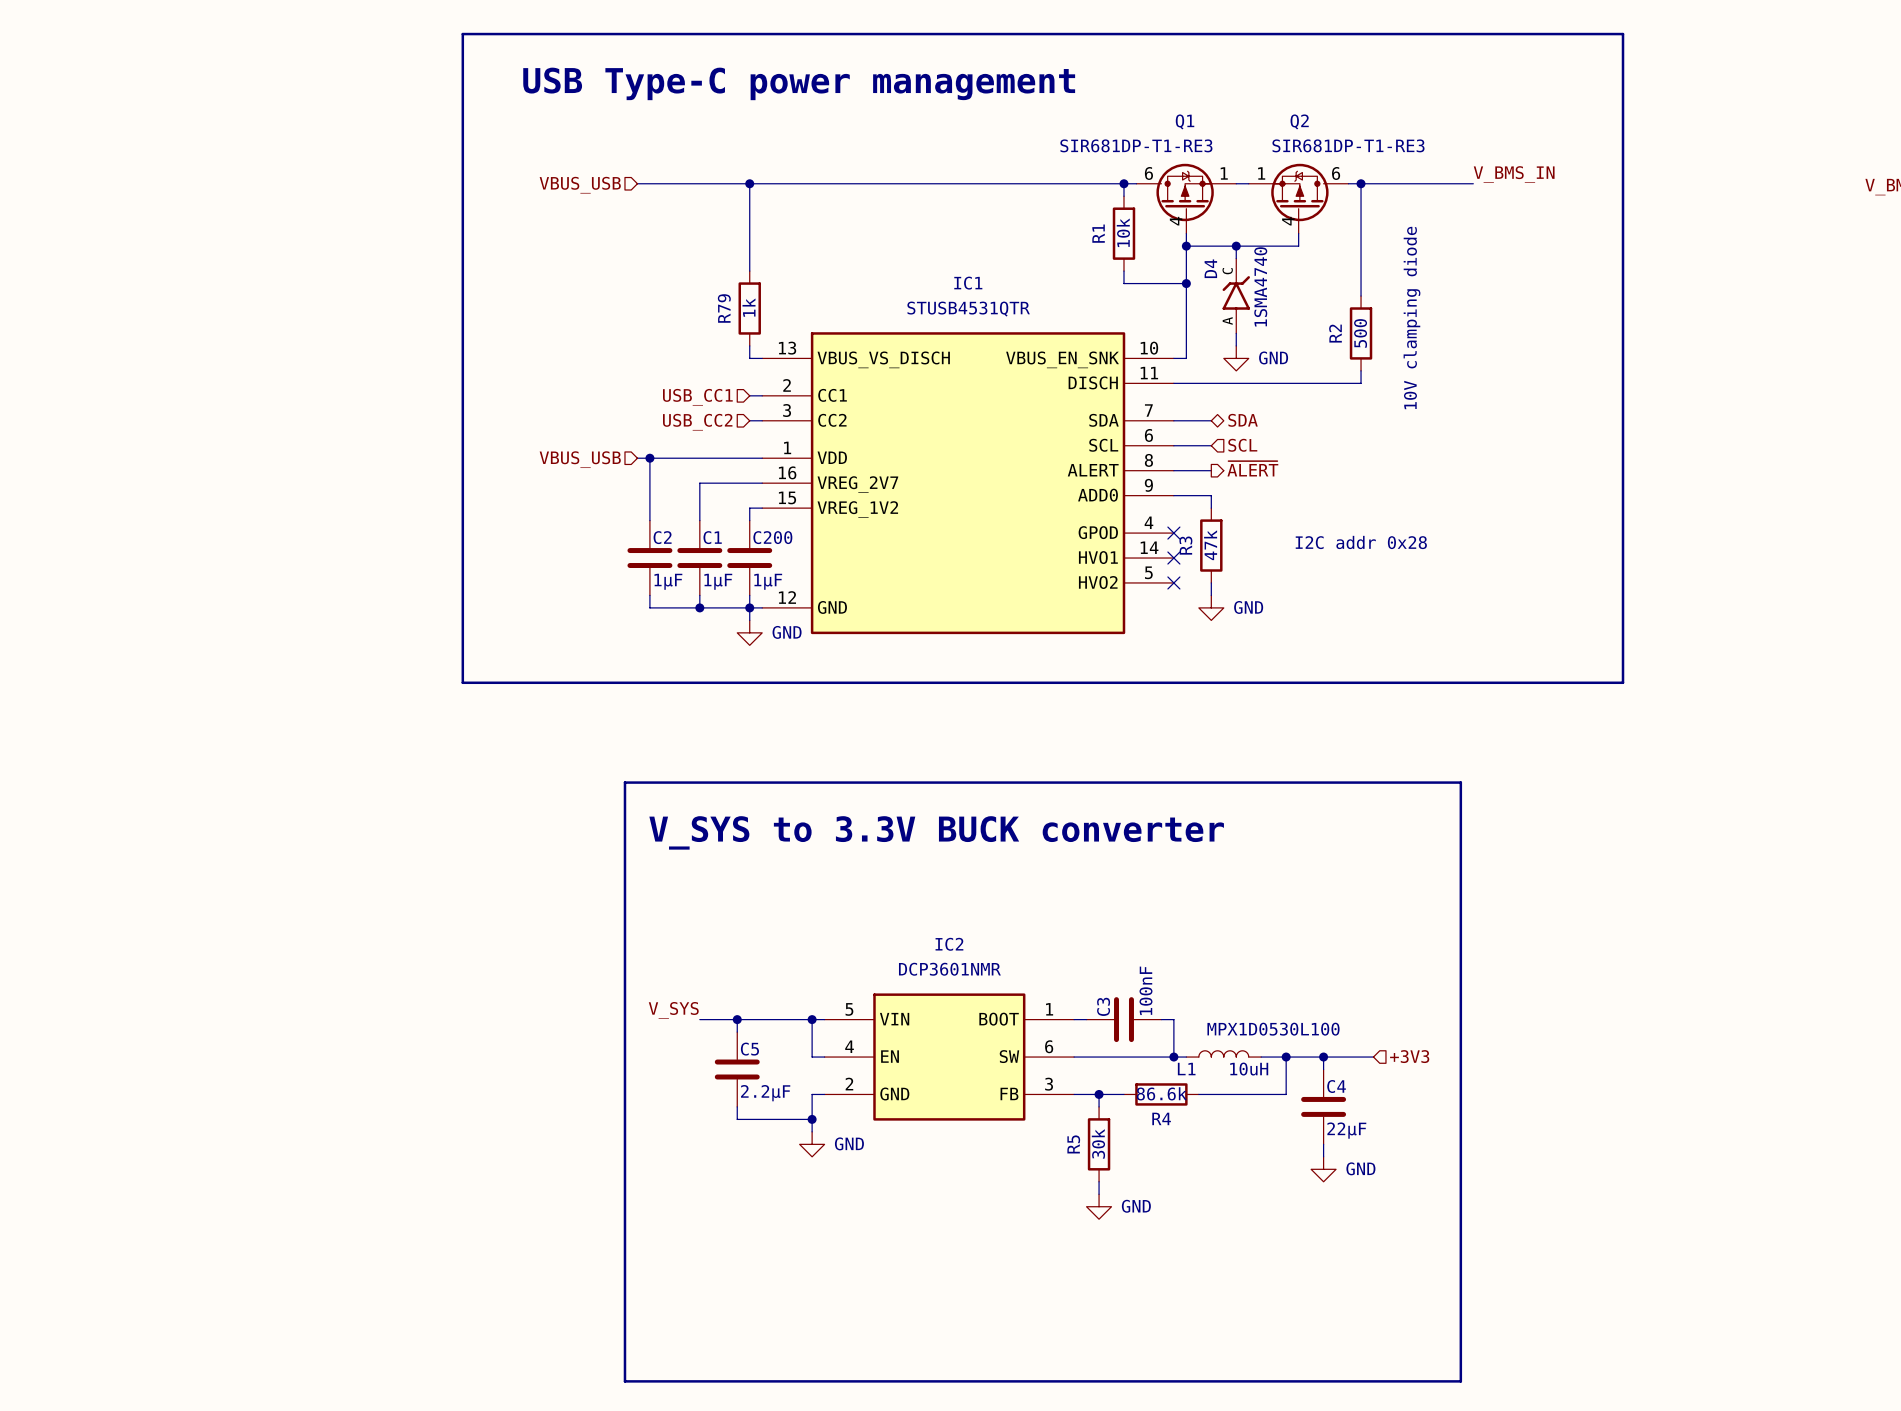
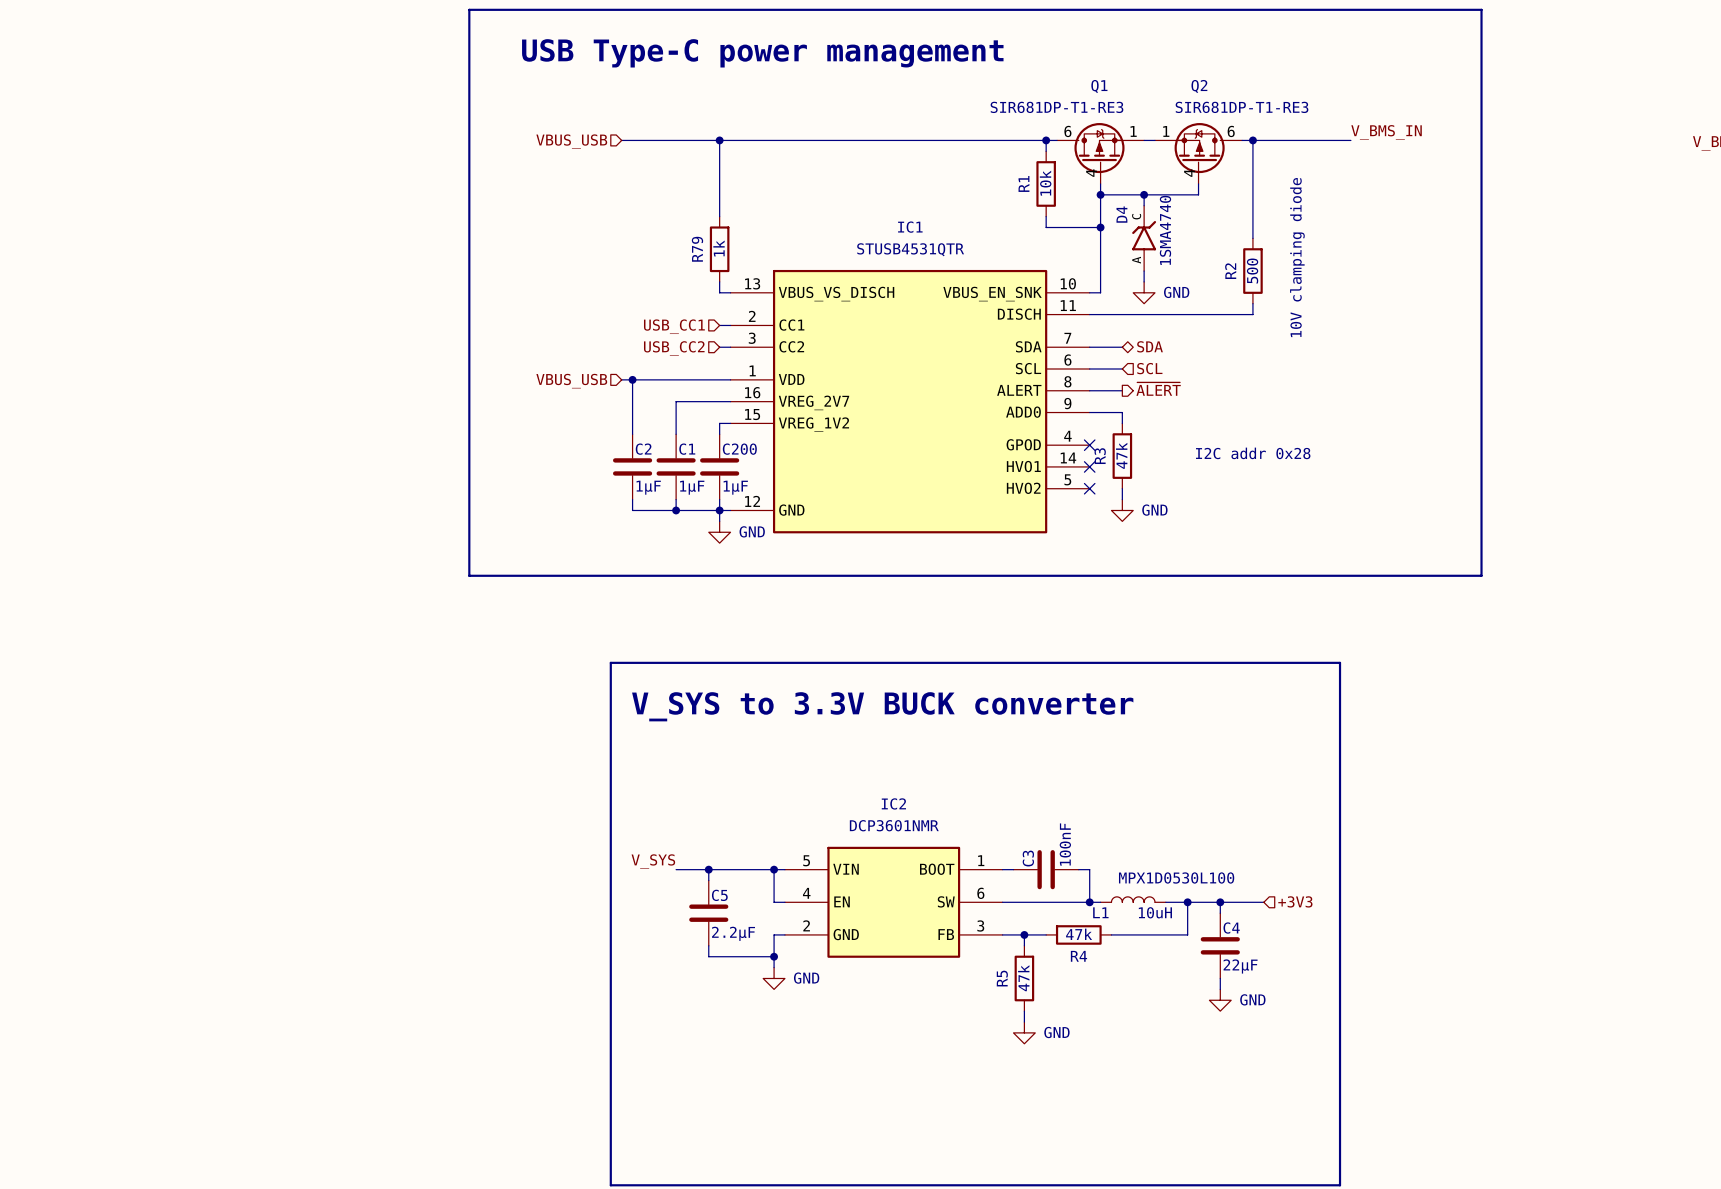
R4 value: 86.6k (1161, 1093) -> 47k (1079, 934)
R5 value: 30k (1098, 1143) -> 47k (1023, 978)

